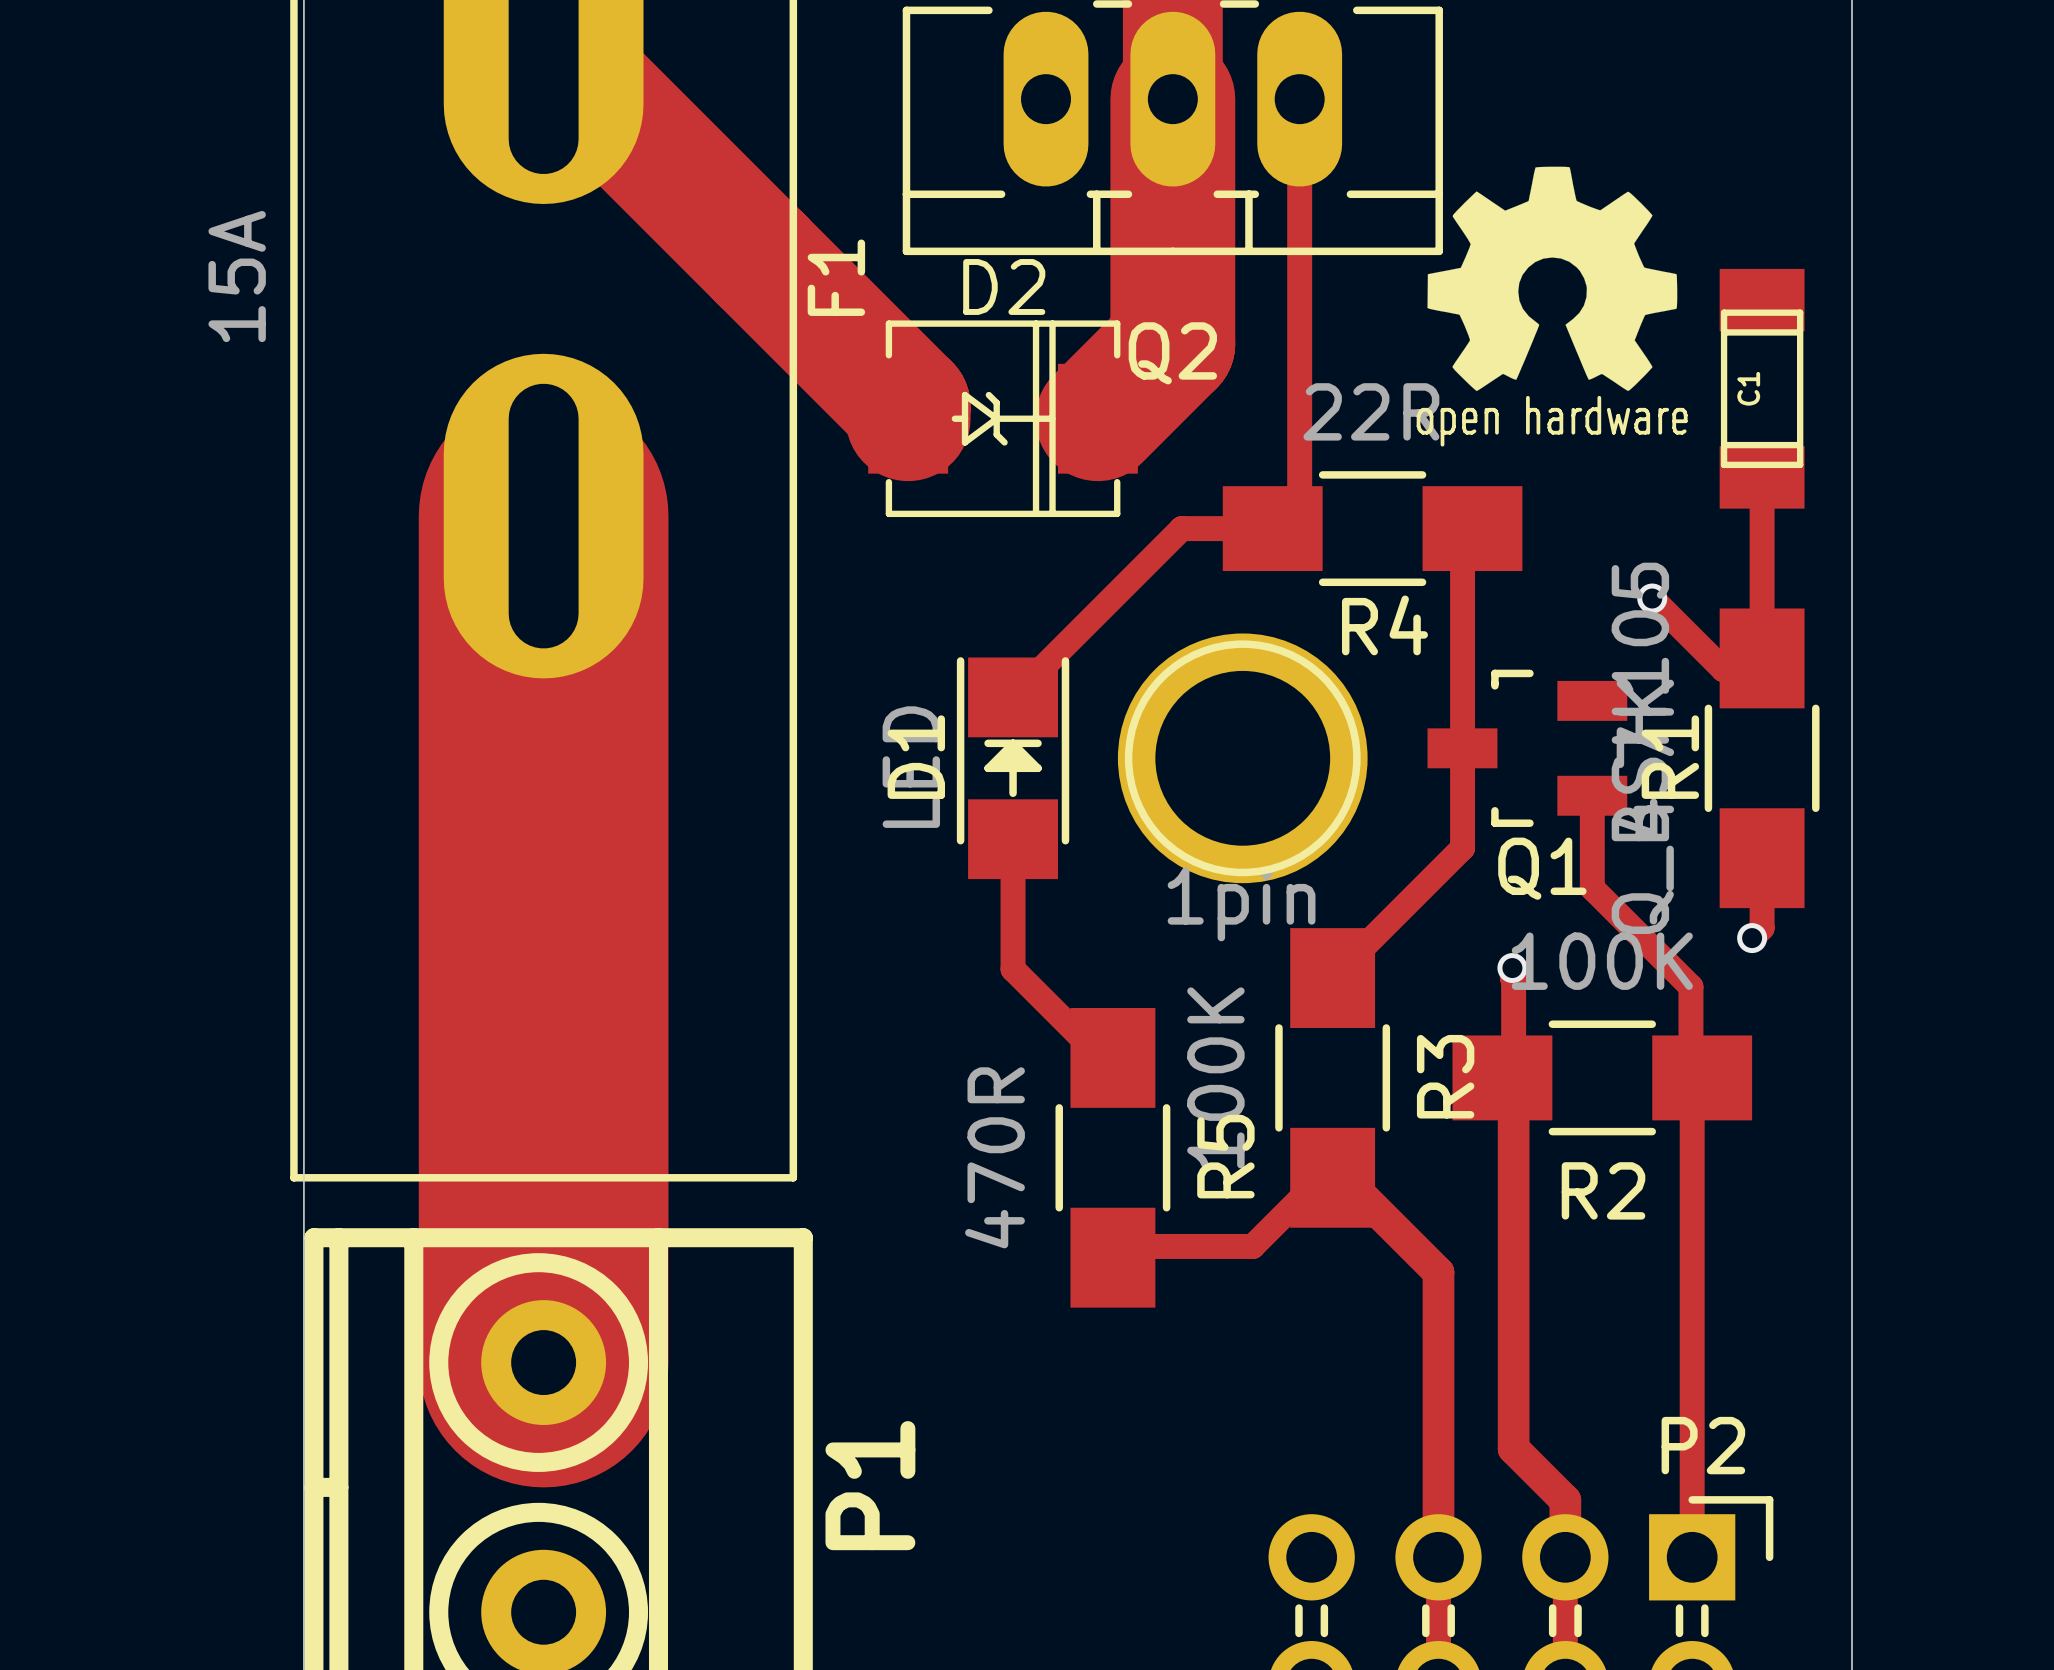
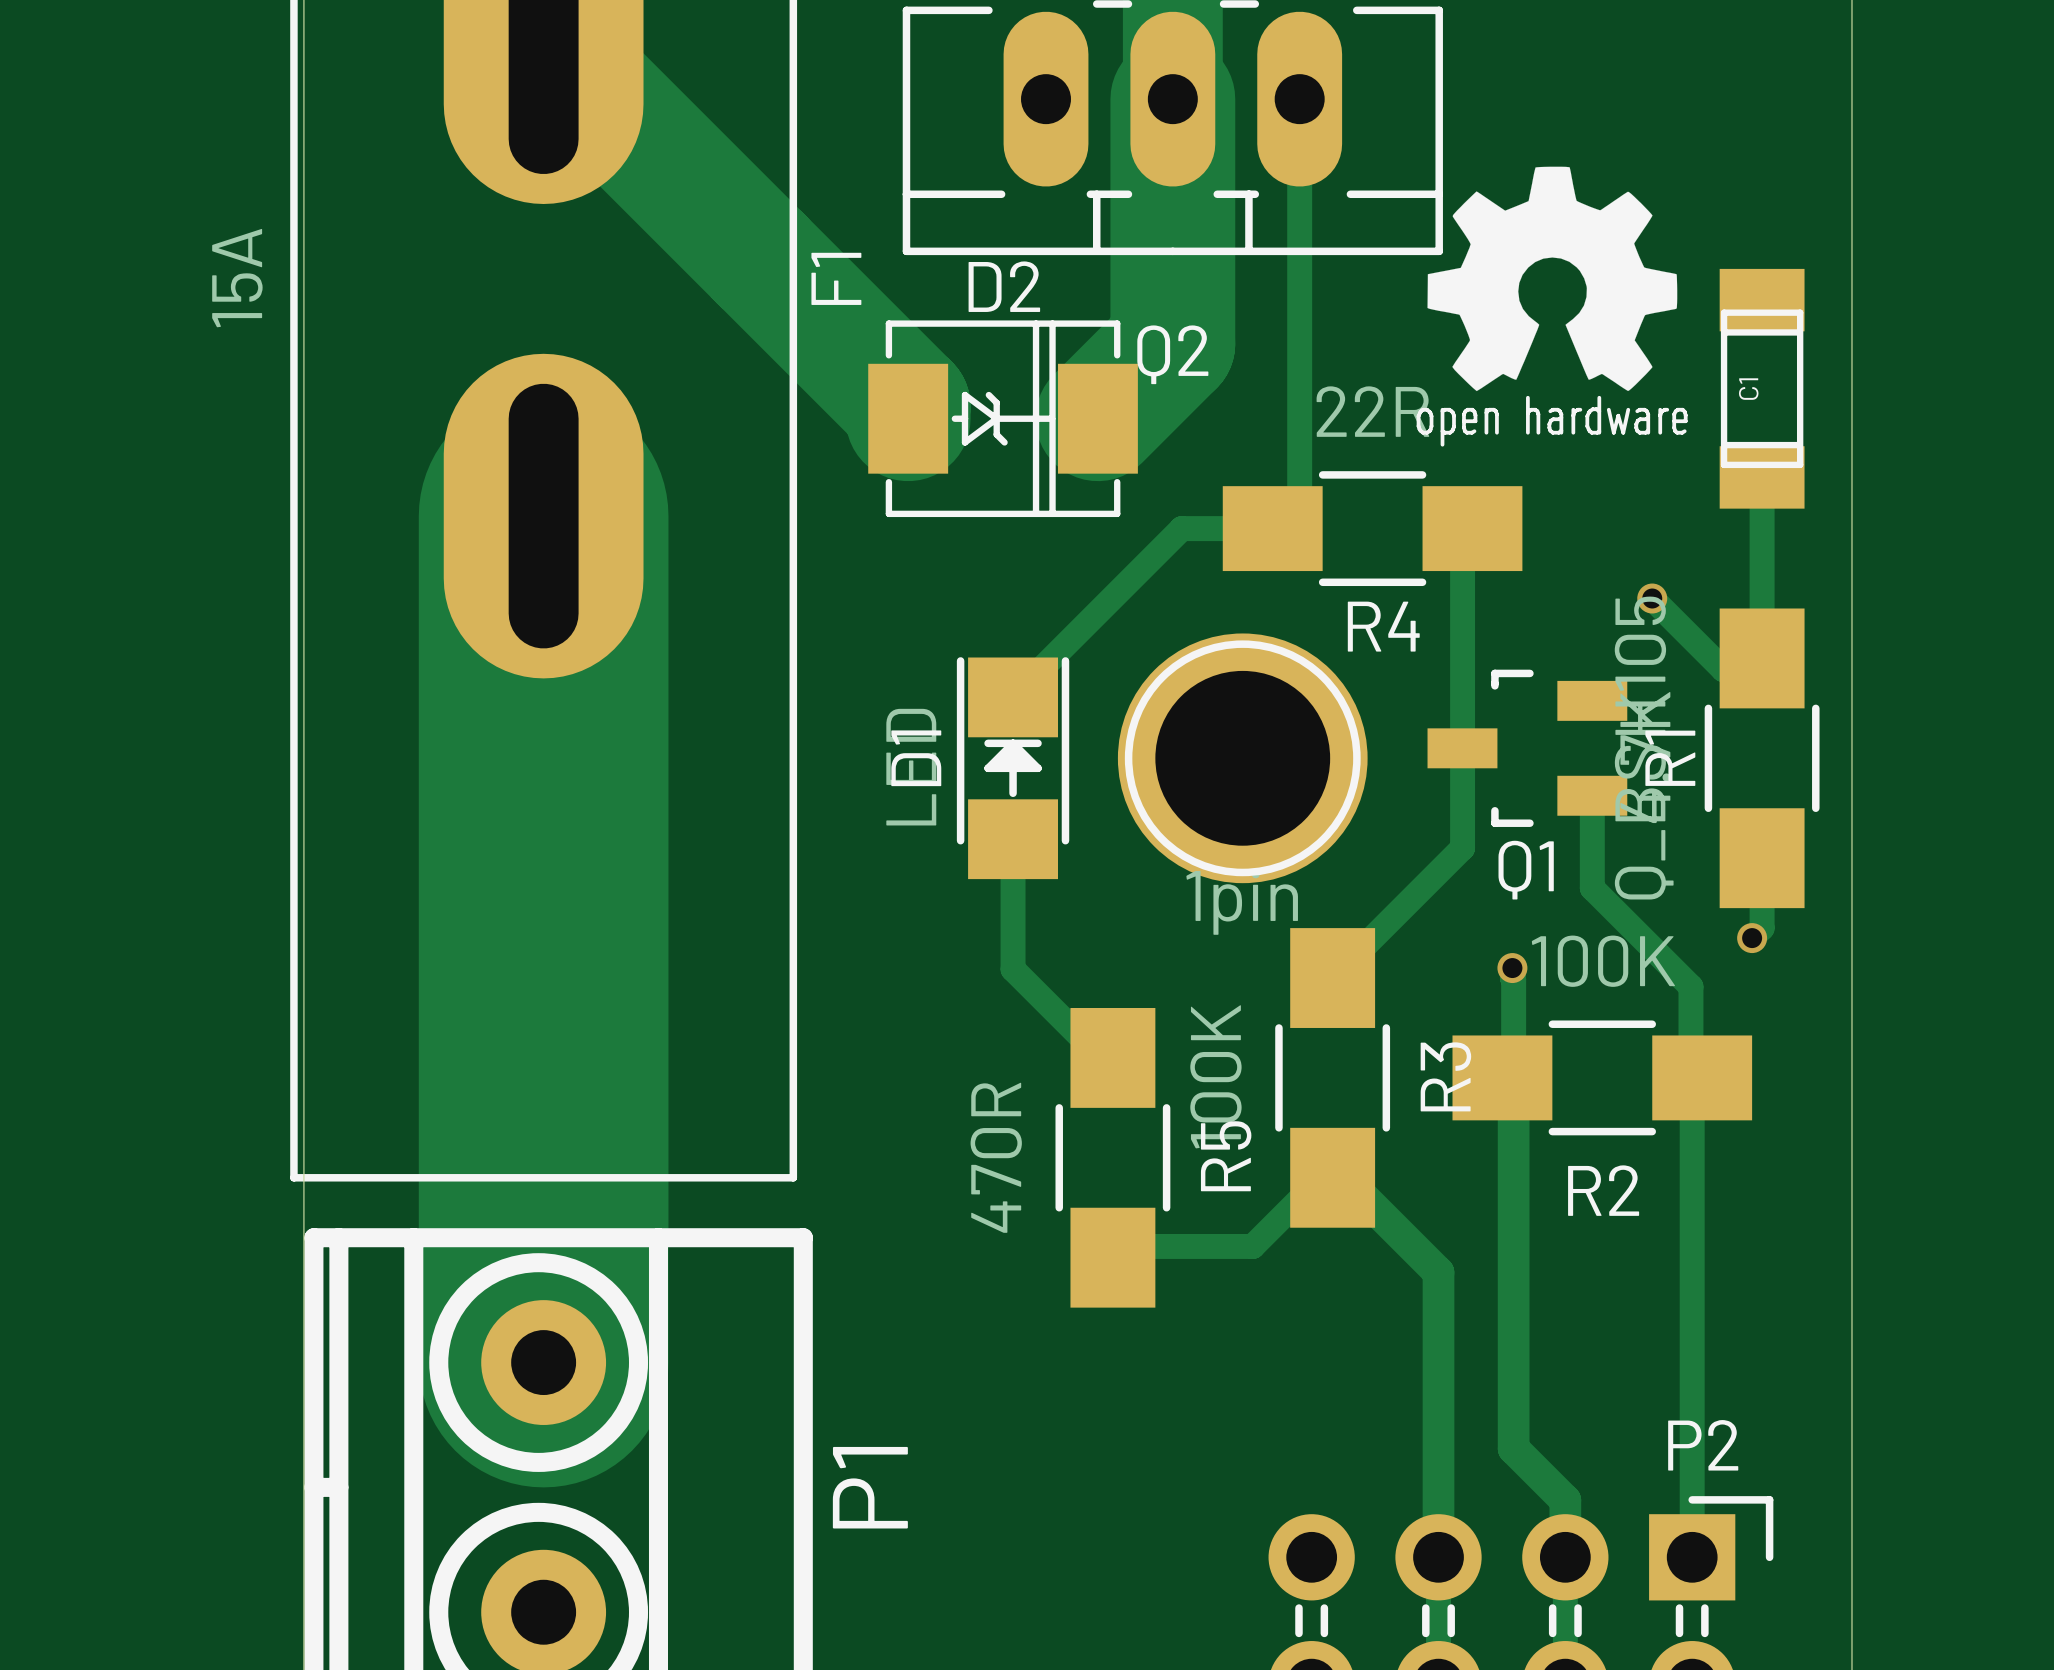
Q1 name position: Q1 (1542, 868) -> Q1 (1526, 870)

